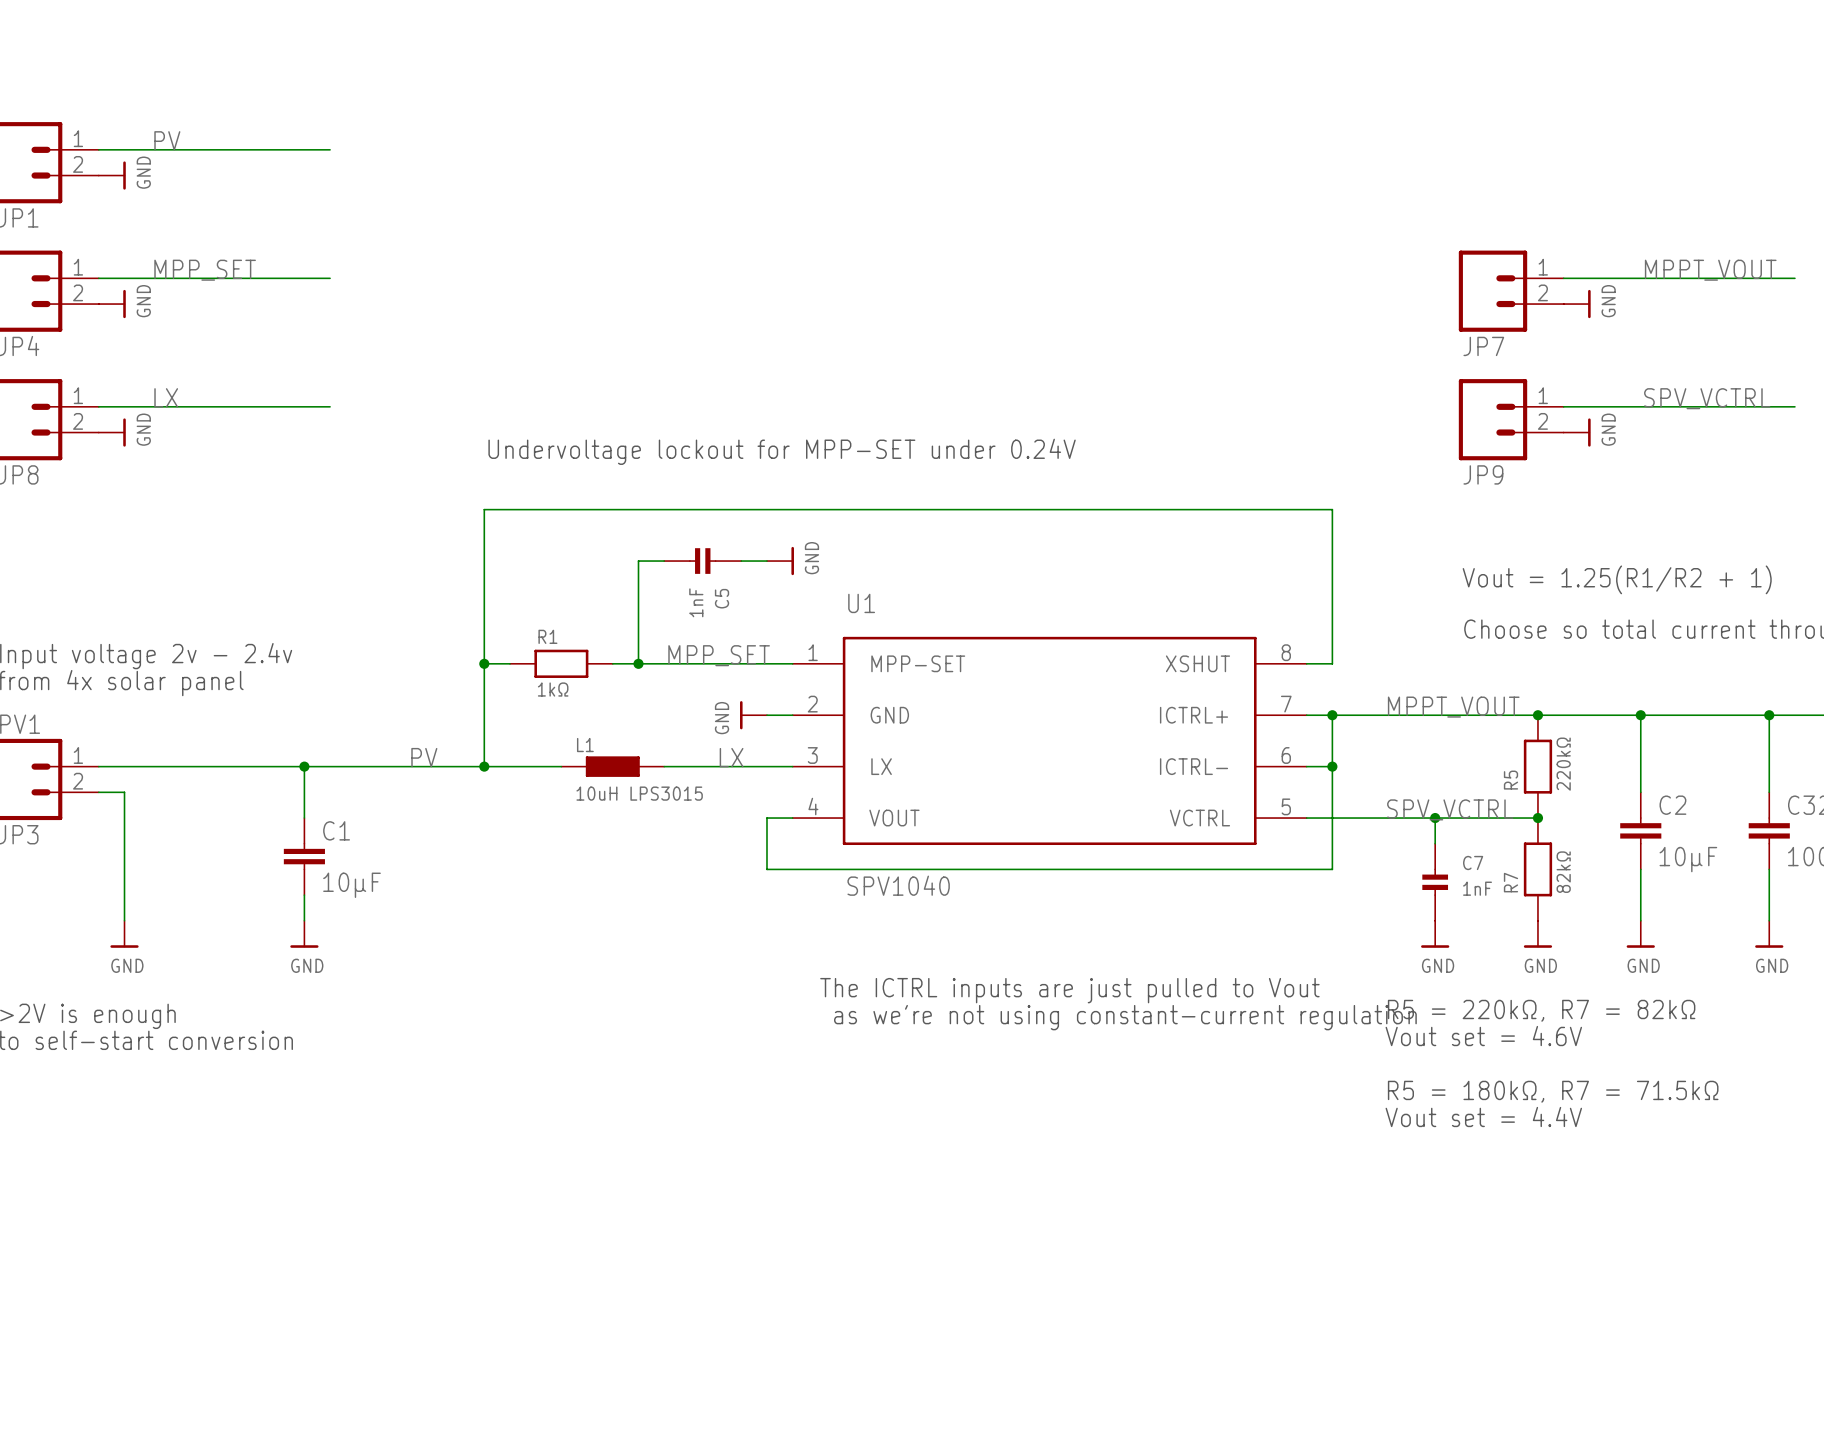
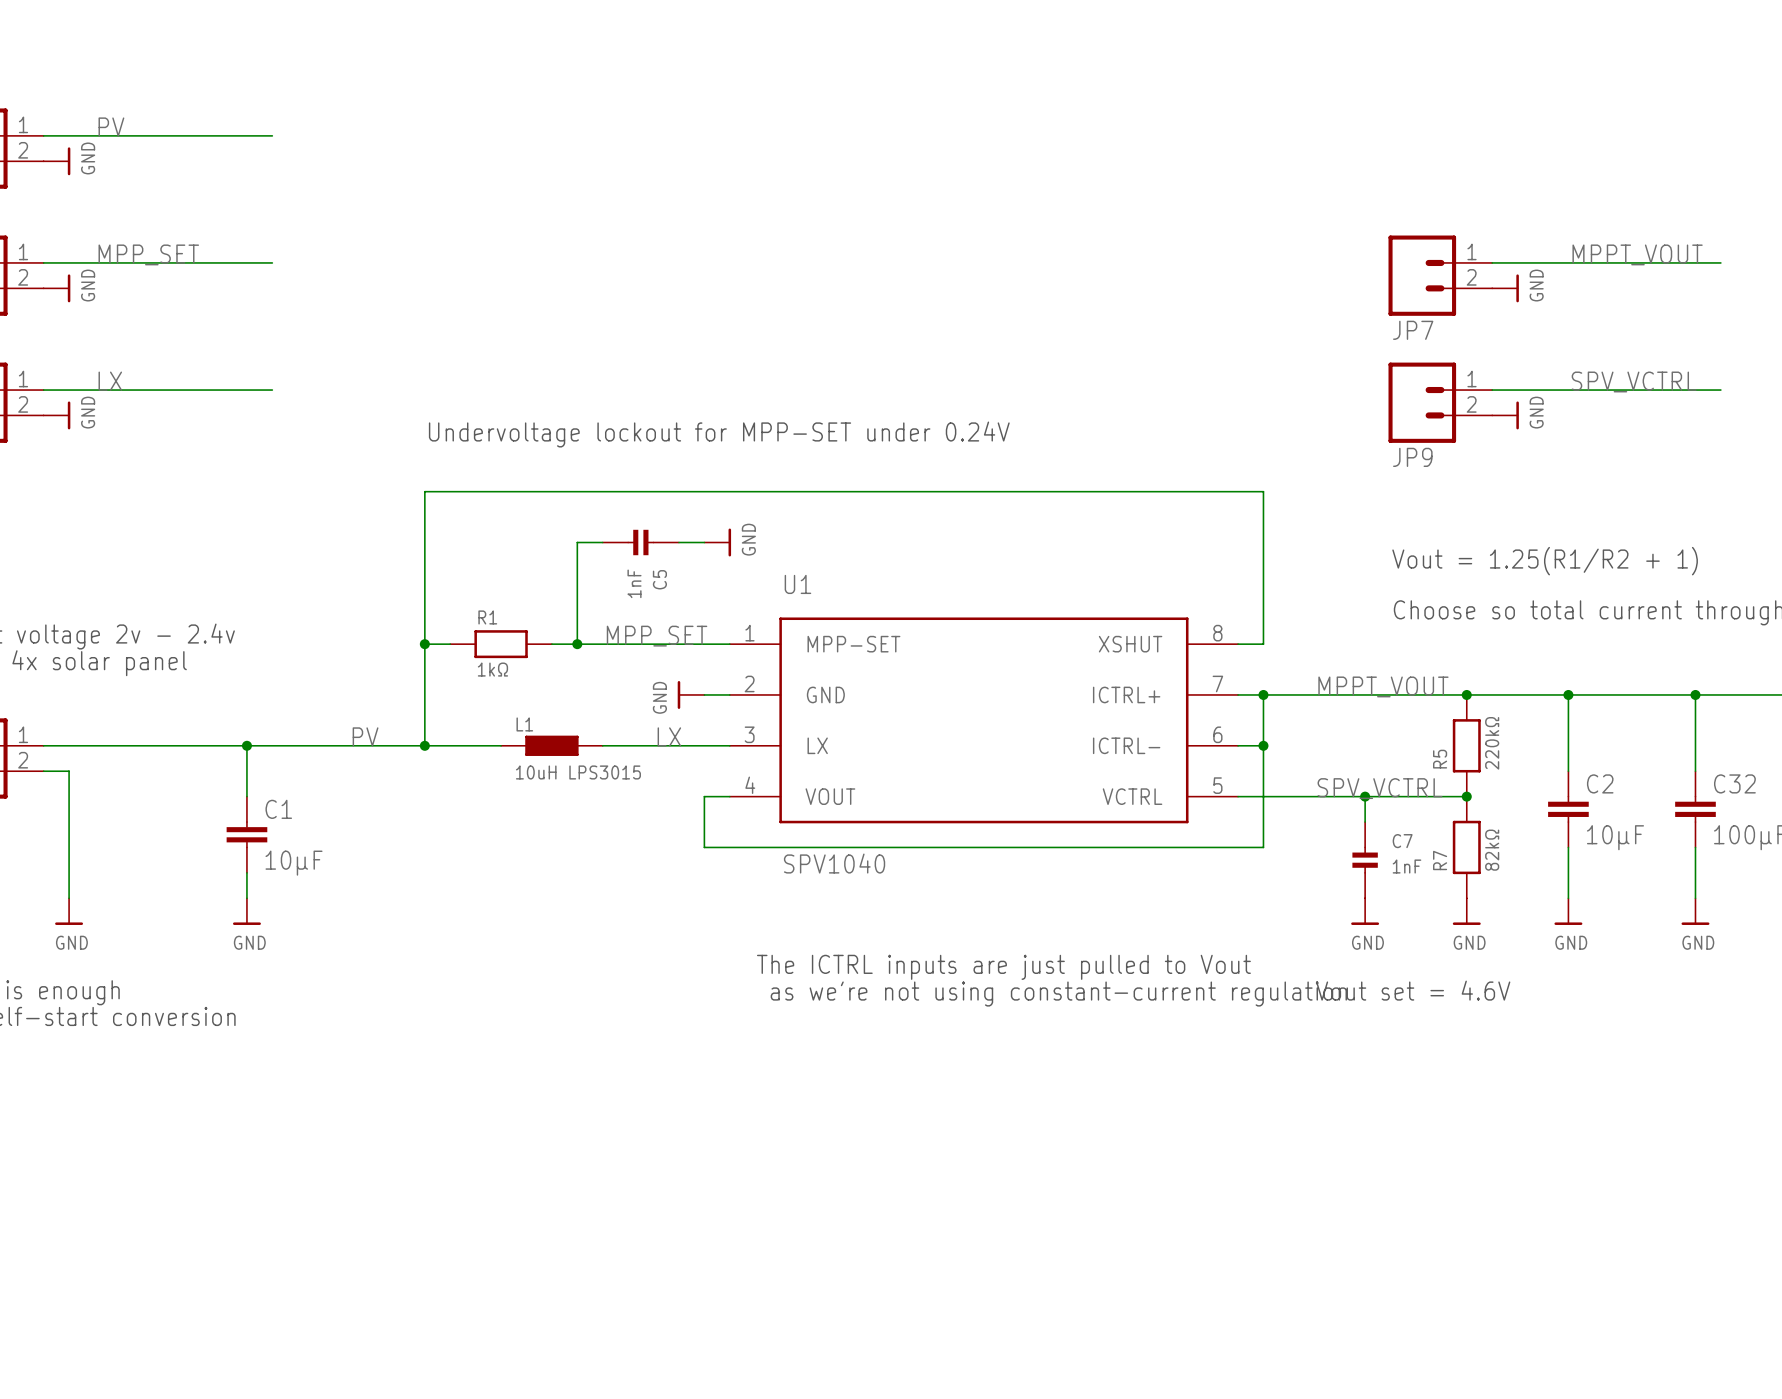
text: R5 = 220kΩ, R7 = 82kΩ (1541, 1010) -> Vout set = 4.6V (1413, 990)
text: Vout set = 4.6V (1483, 1036) -> none
text: R5 = 180kΩ, R7 = 71.5kΩ (1553, 1091) -> none
text: Vout set = 4.4V (1483, 1116) -> none

